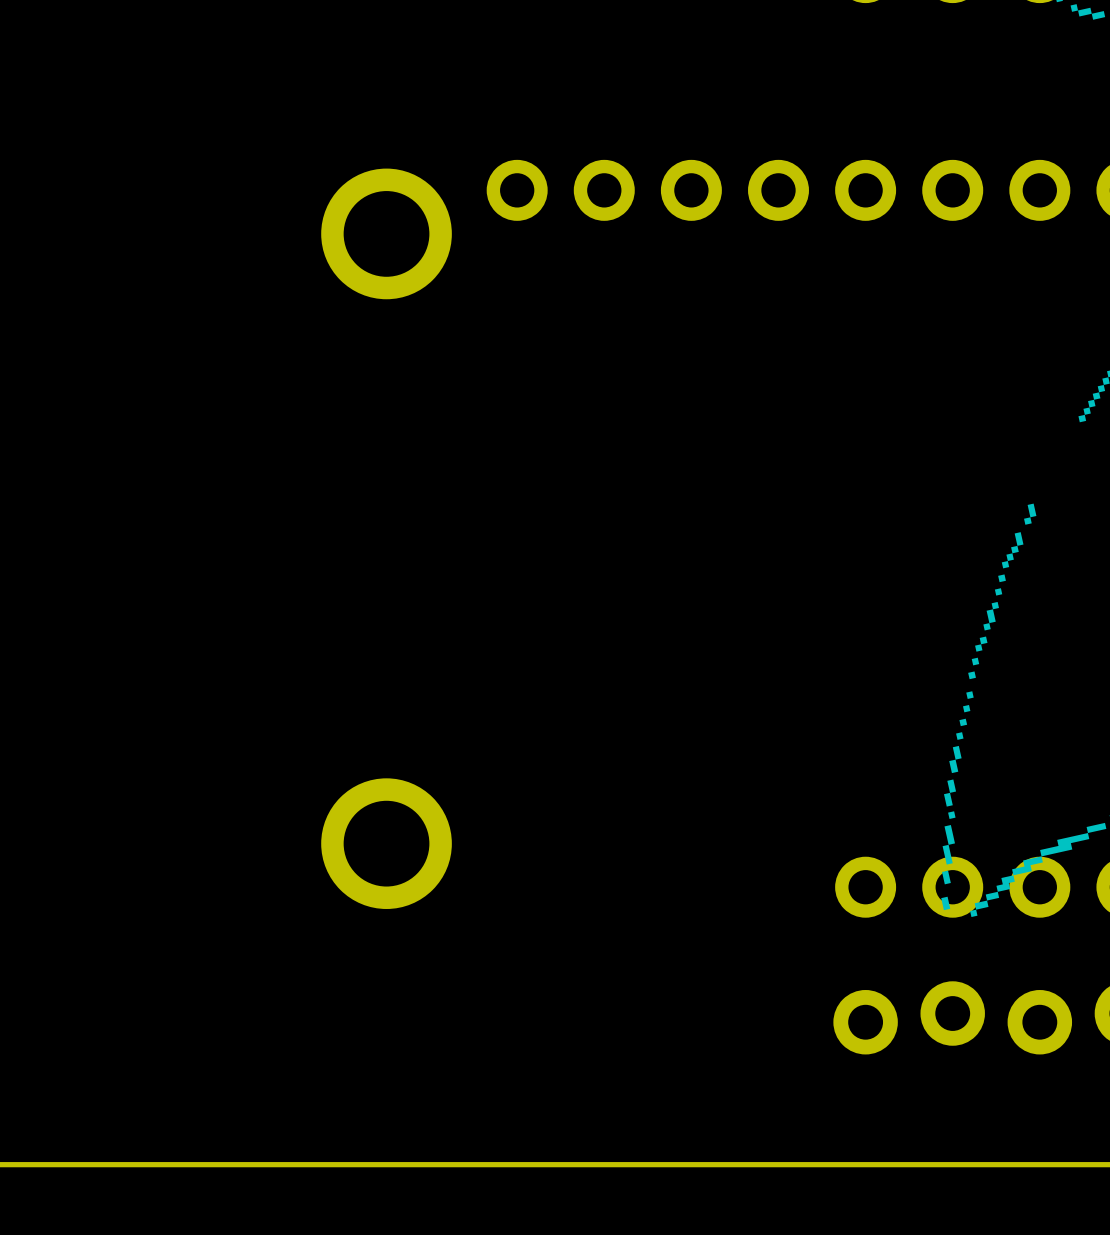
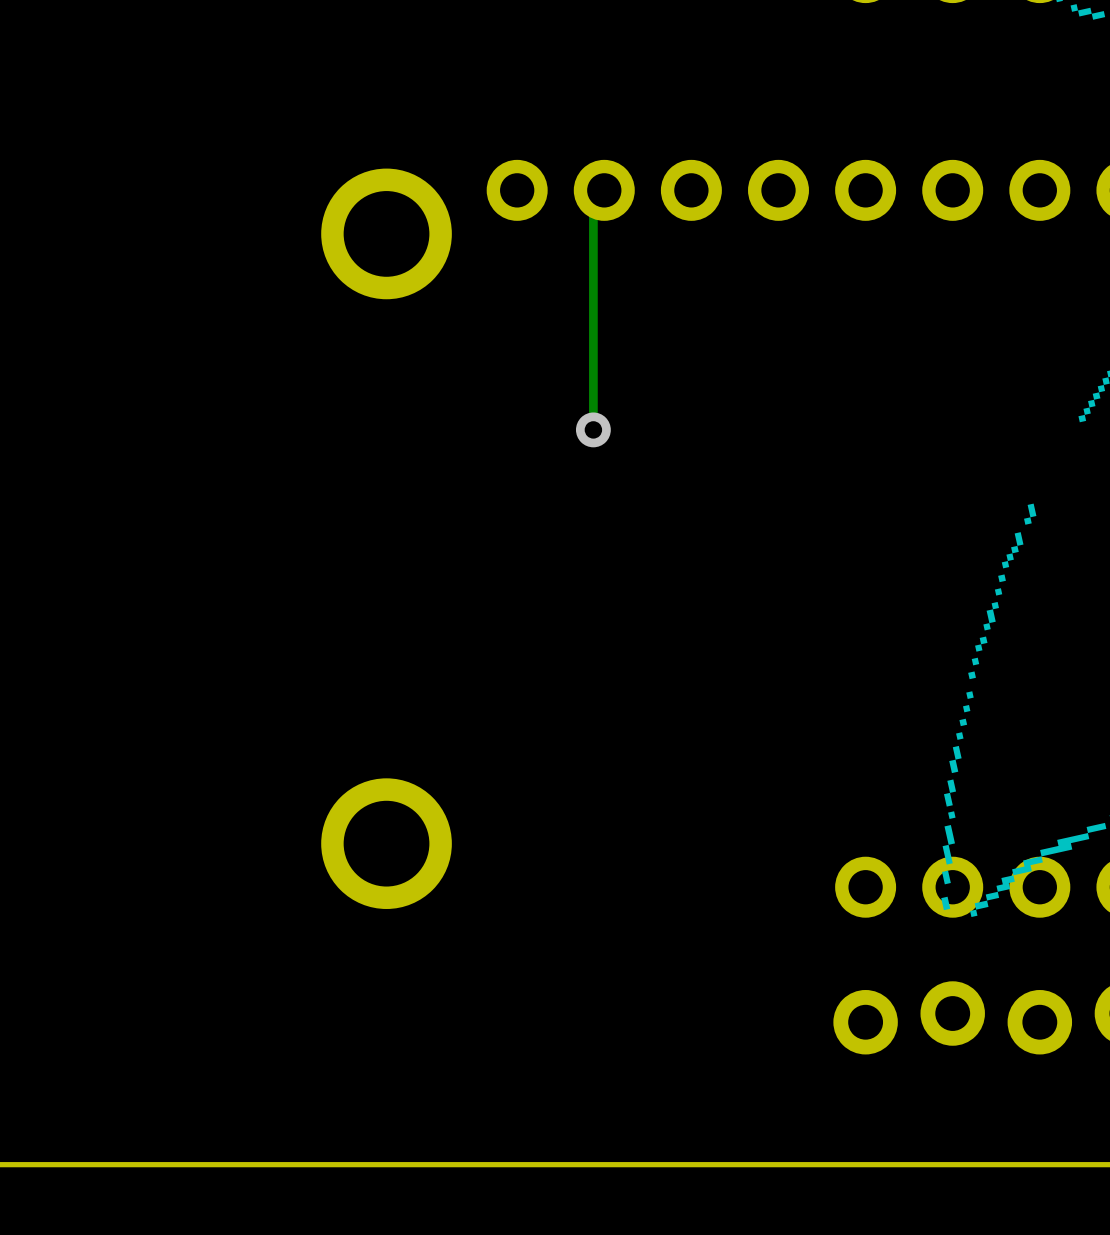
track: none -> (604, 190) (593, 201) (593, 429)
via: none -> (593, 429)

